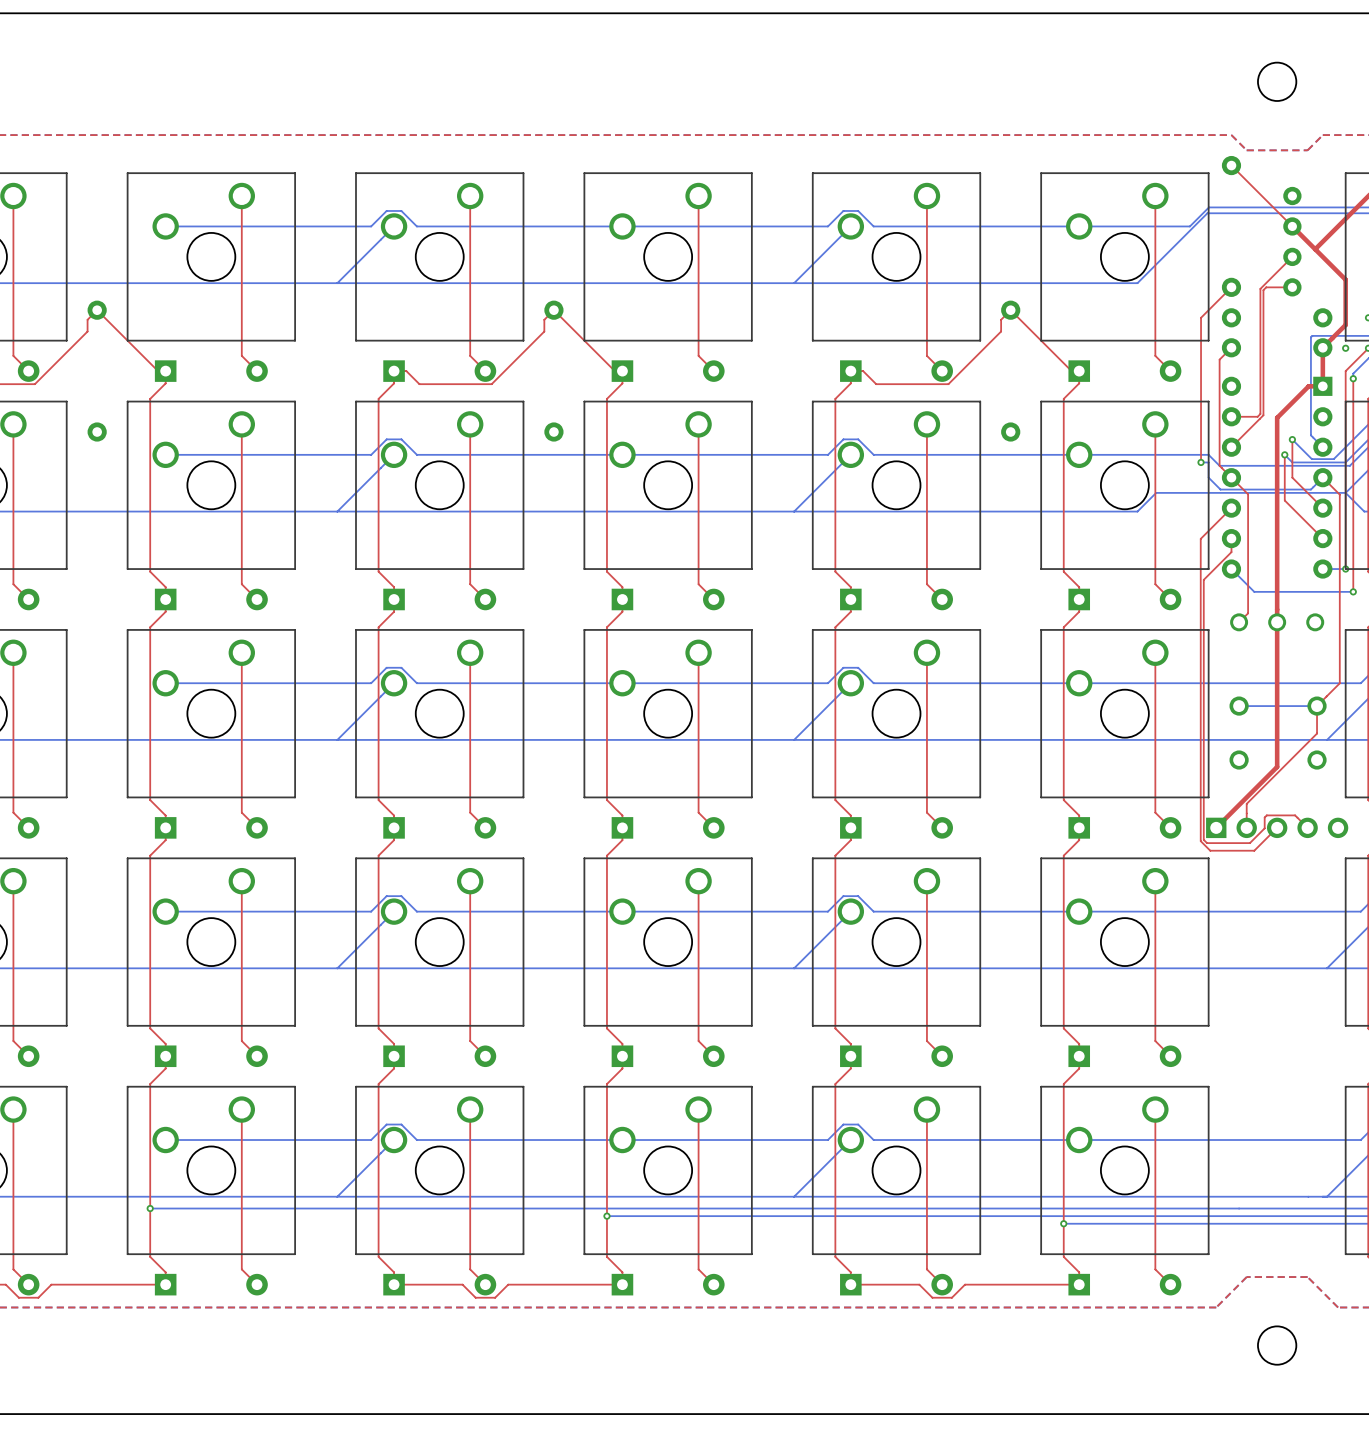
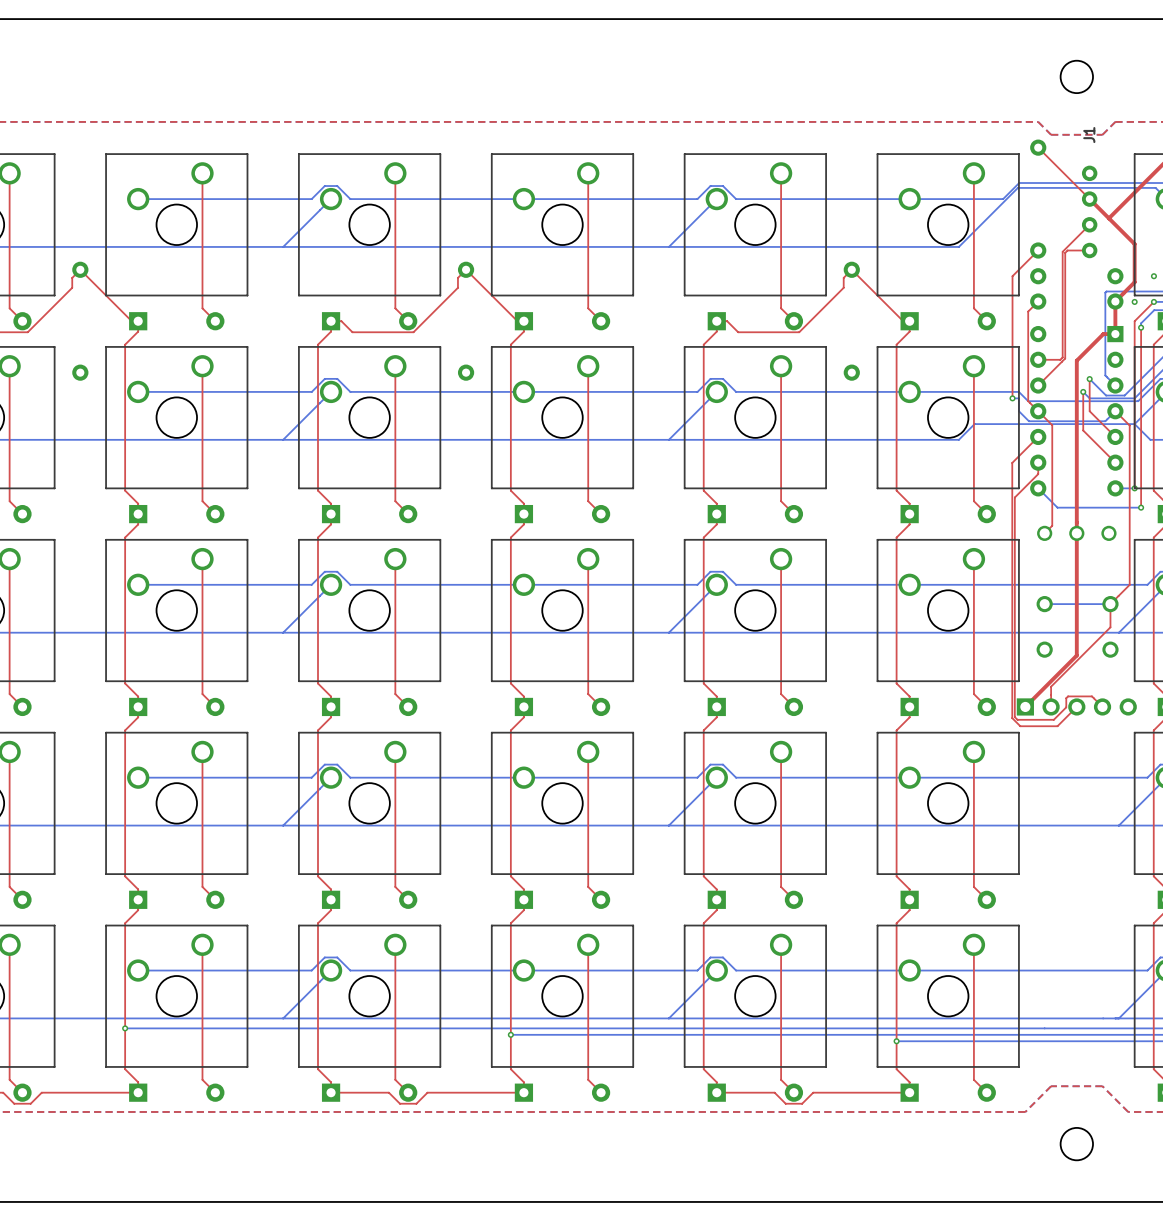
J1 name: none -> J1 (1089, 135)

